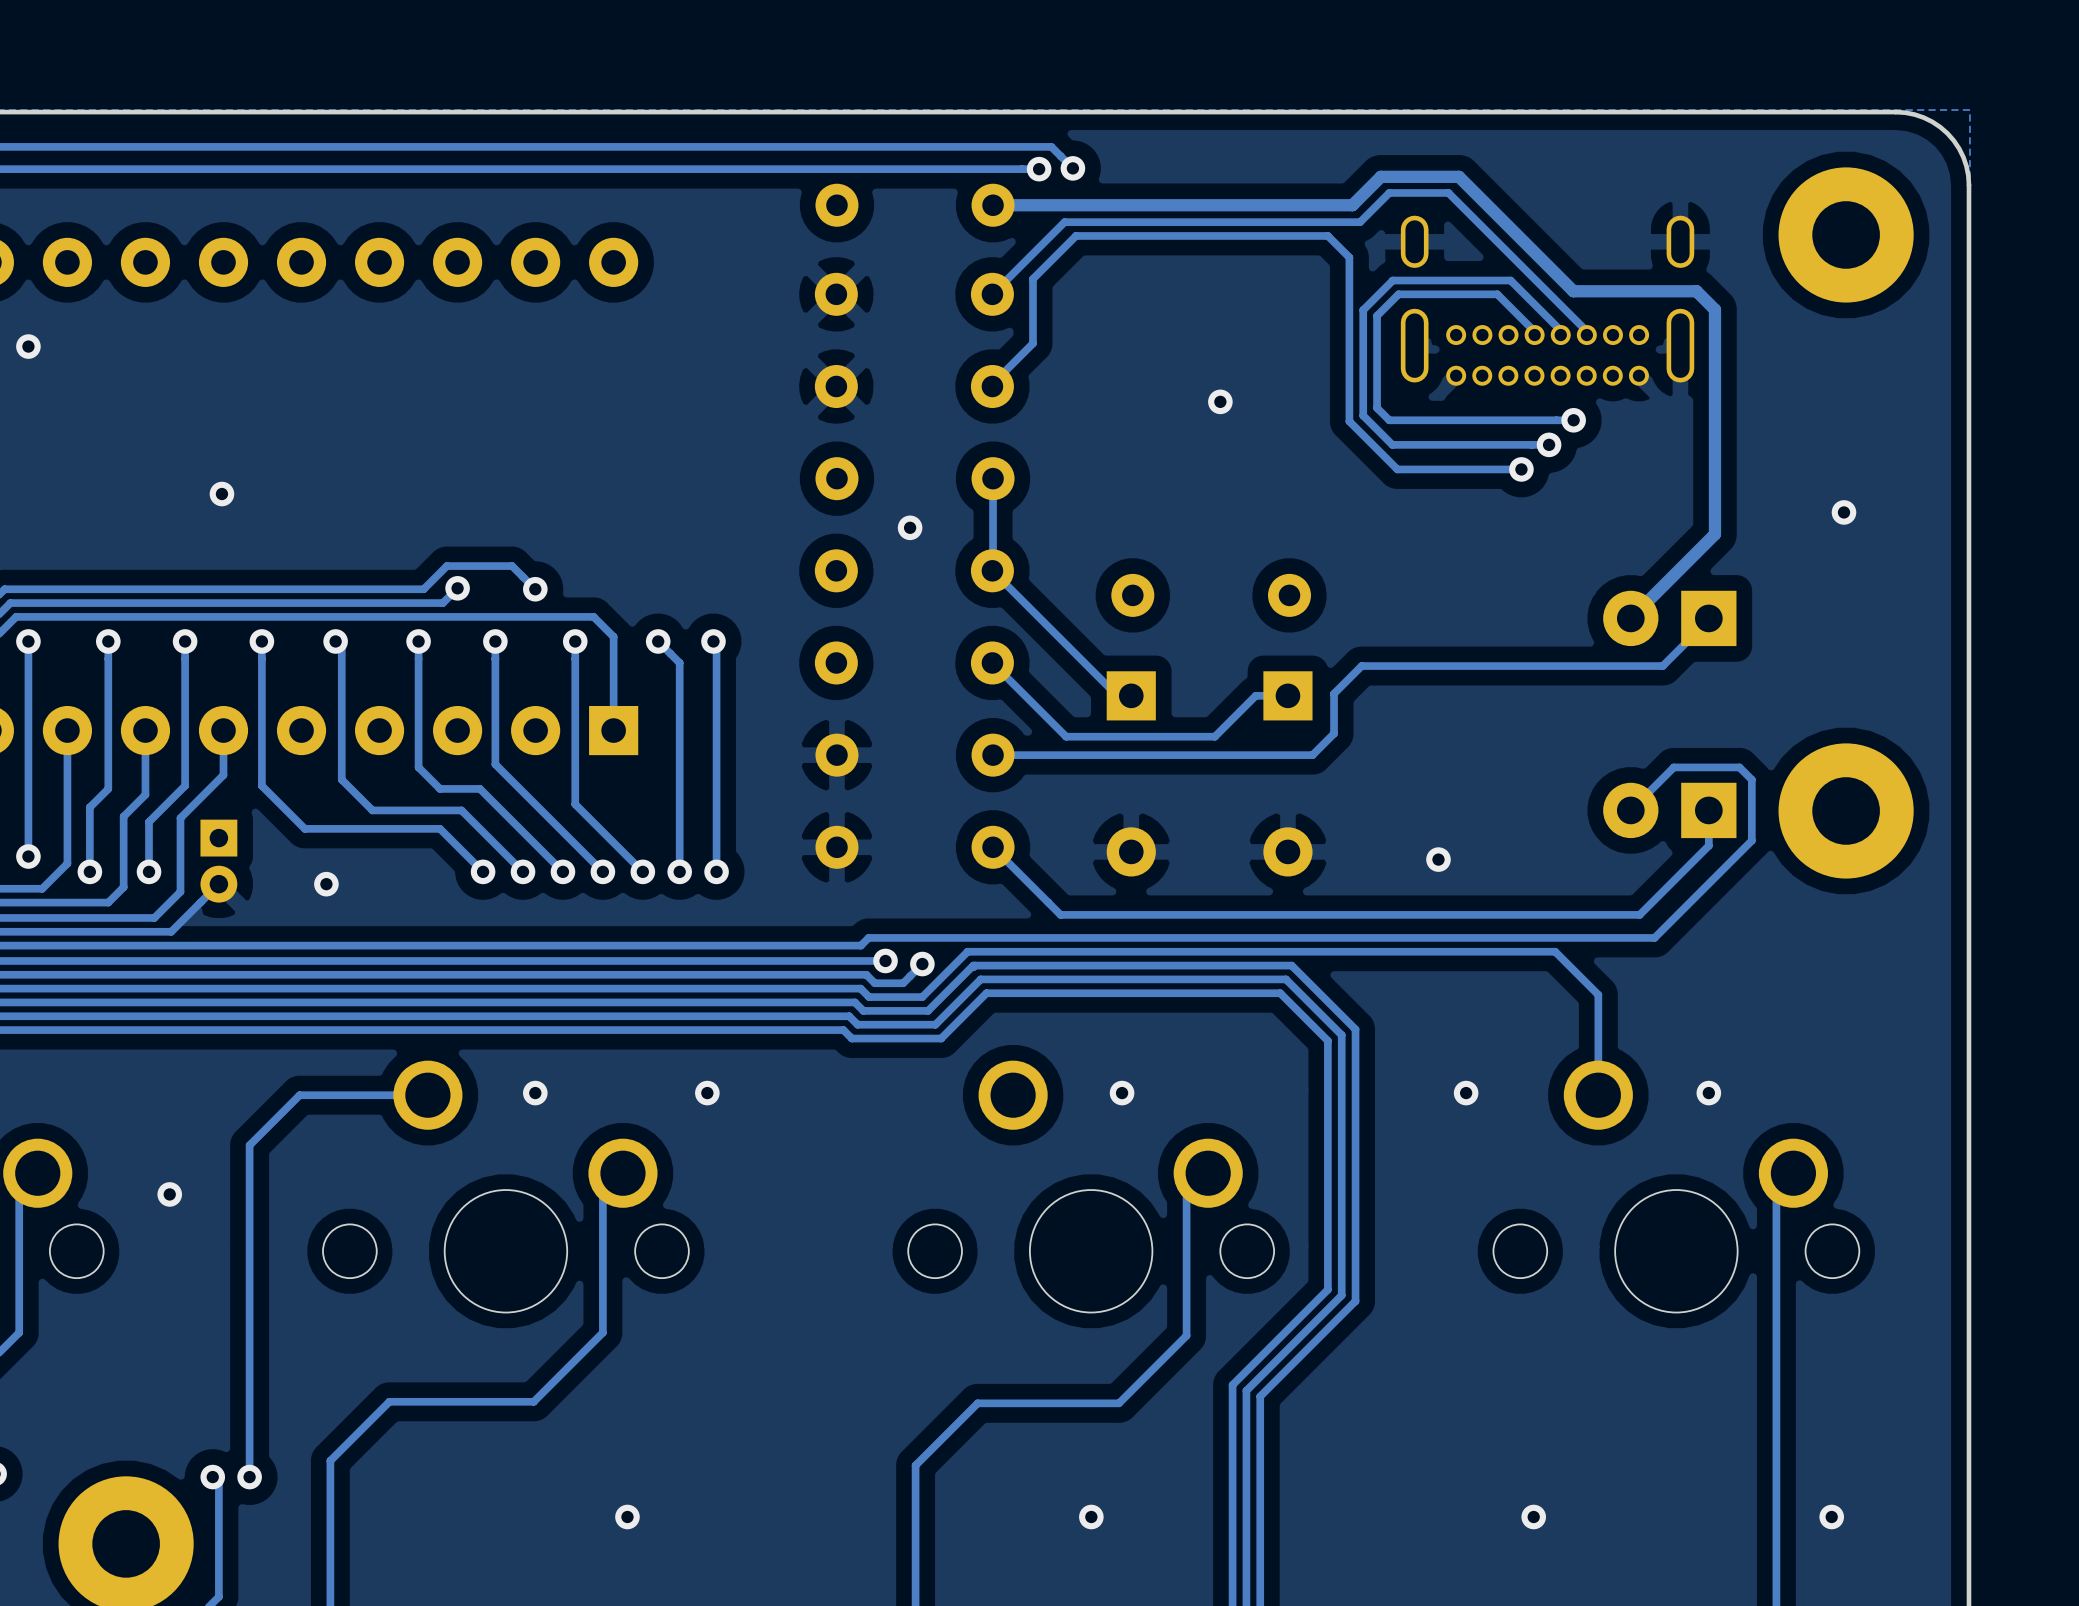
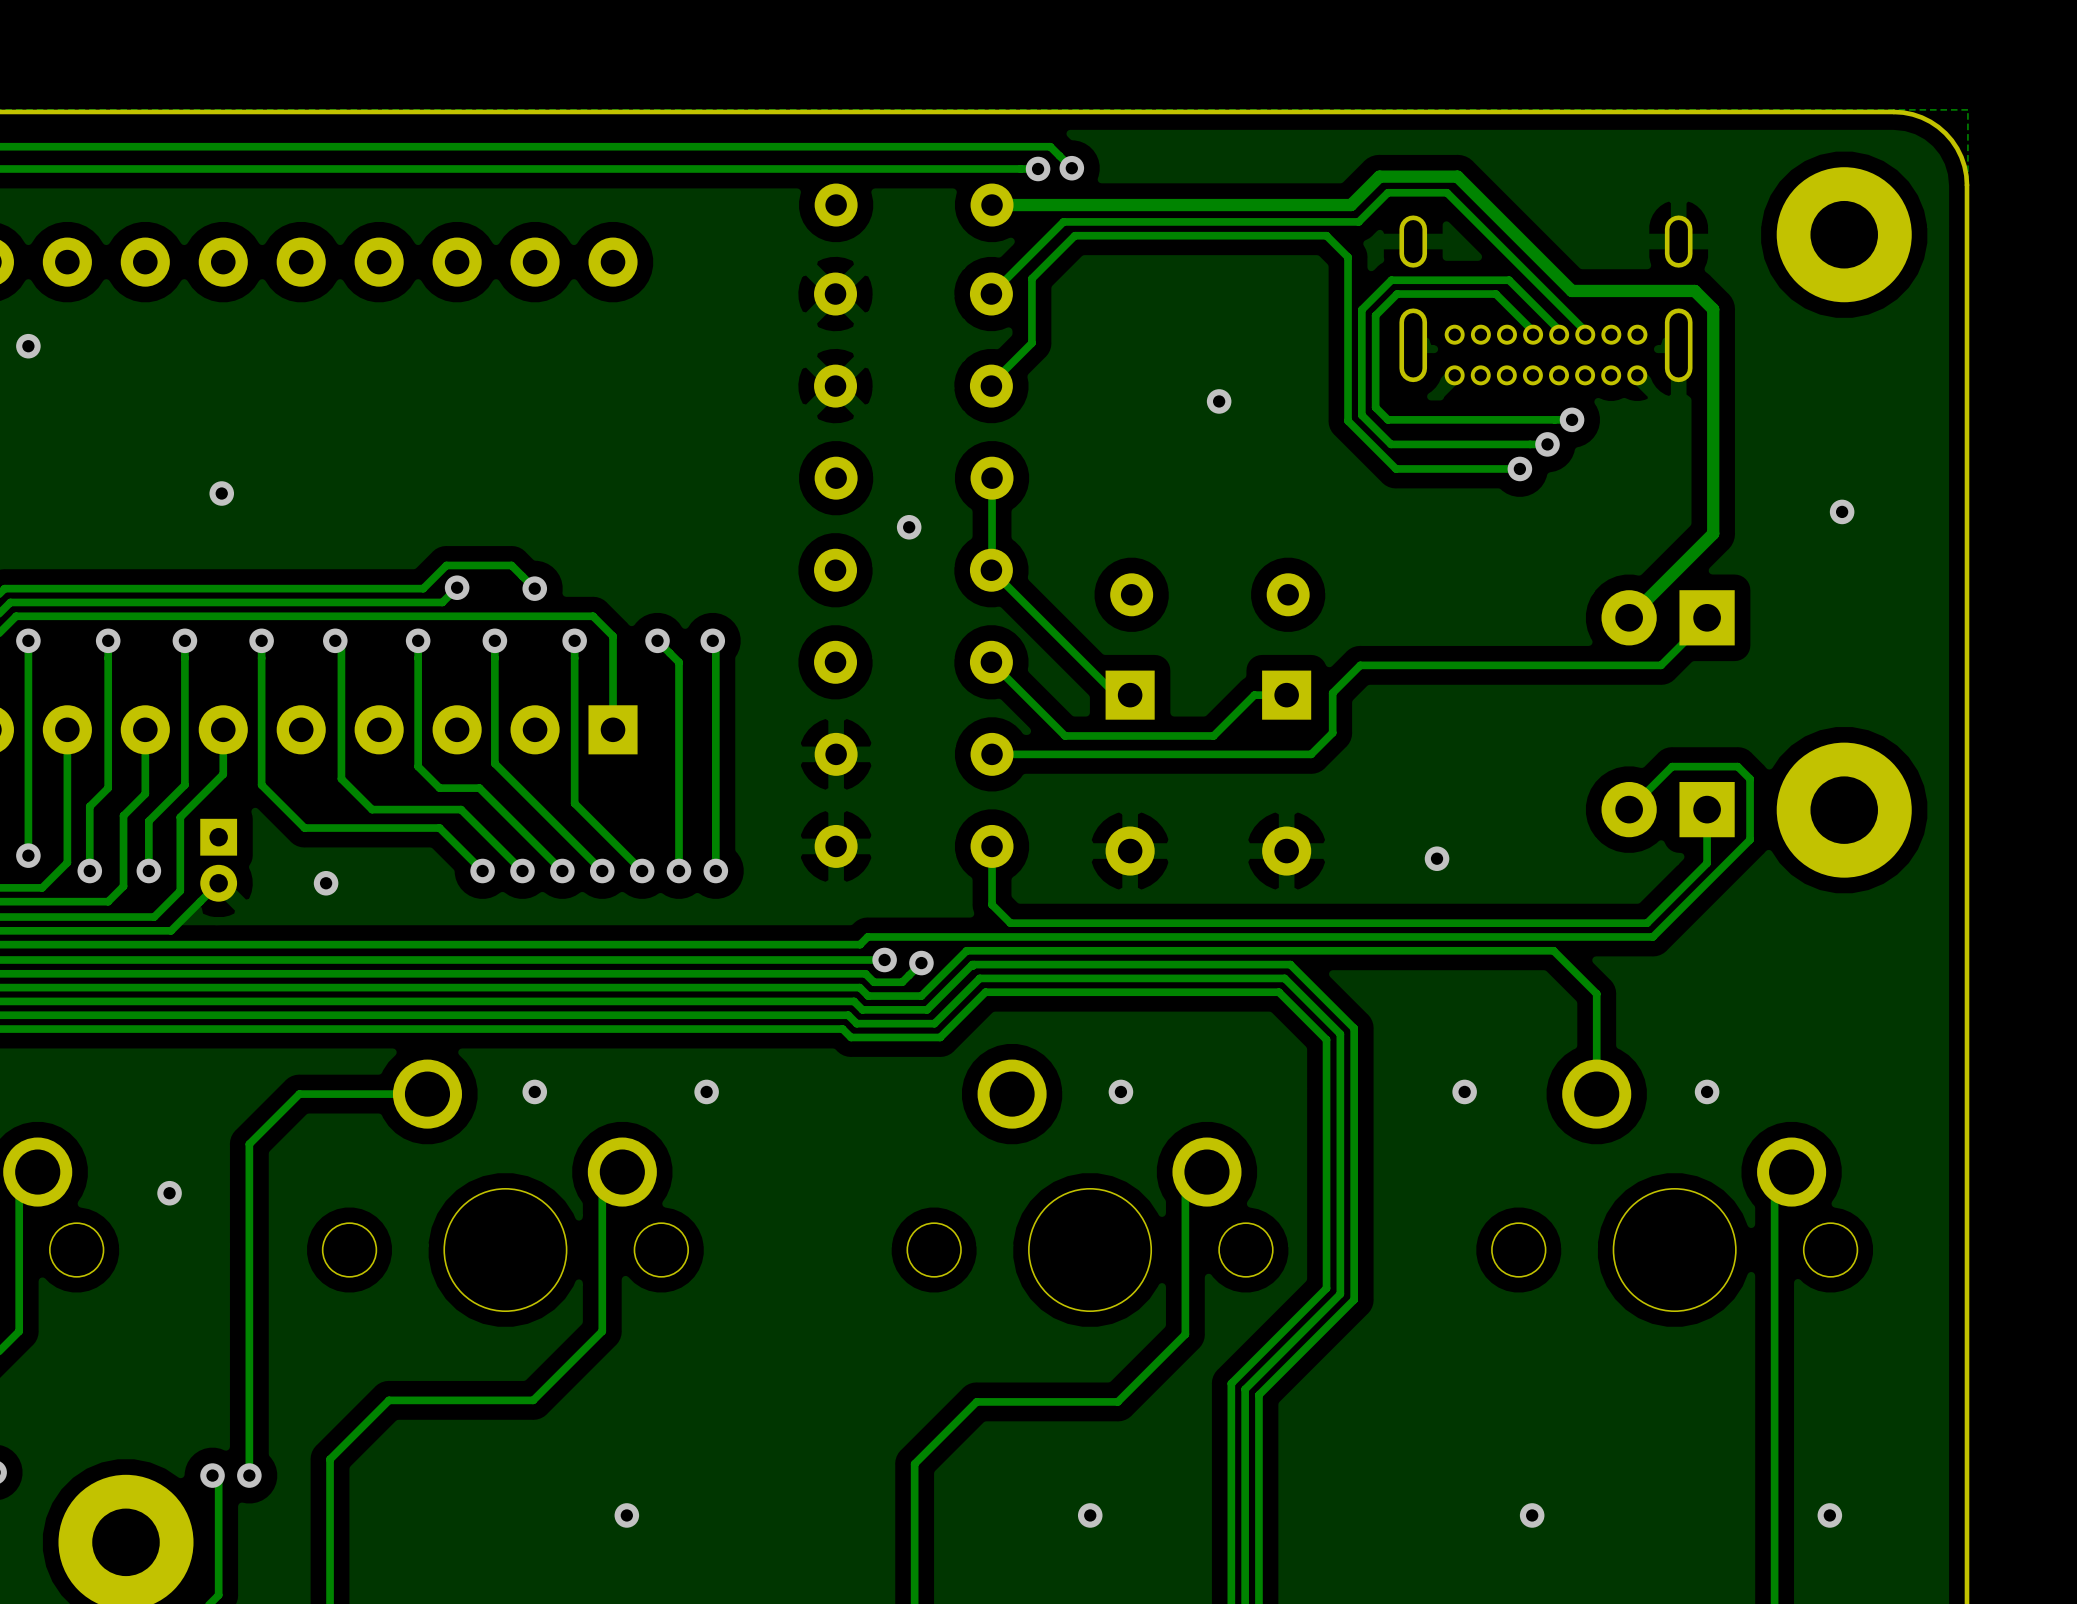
track: (1708, 845) (1639, 914) (1060, 914) (993, 847) -> (1707, 844) (1707, 863) (1647, 923) (1010, 923) (992, 904) (992, 846)

